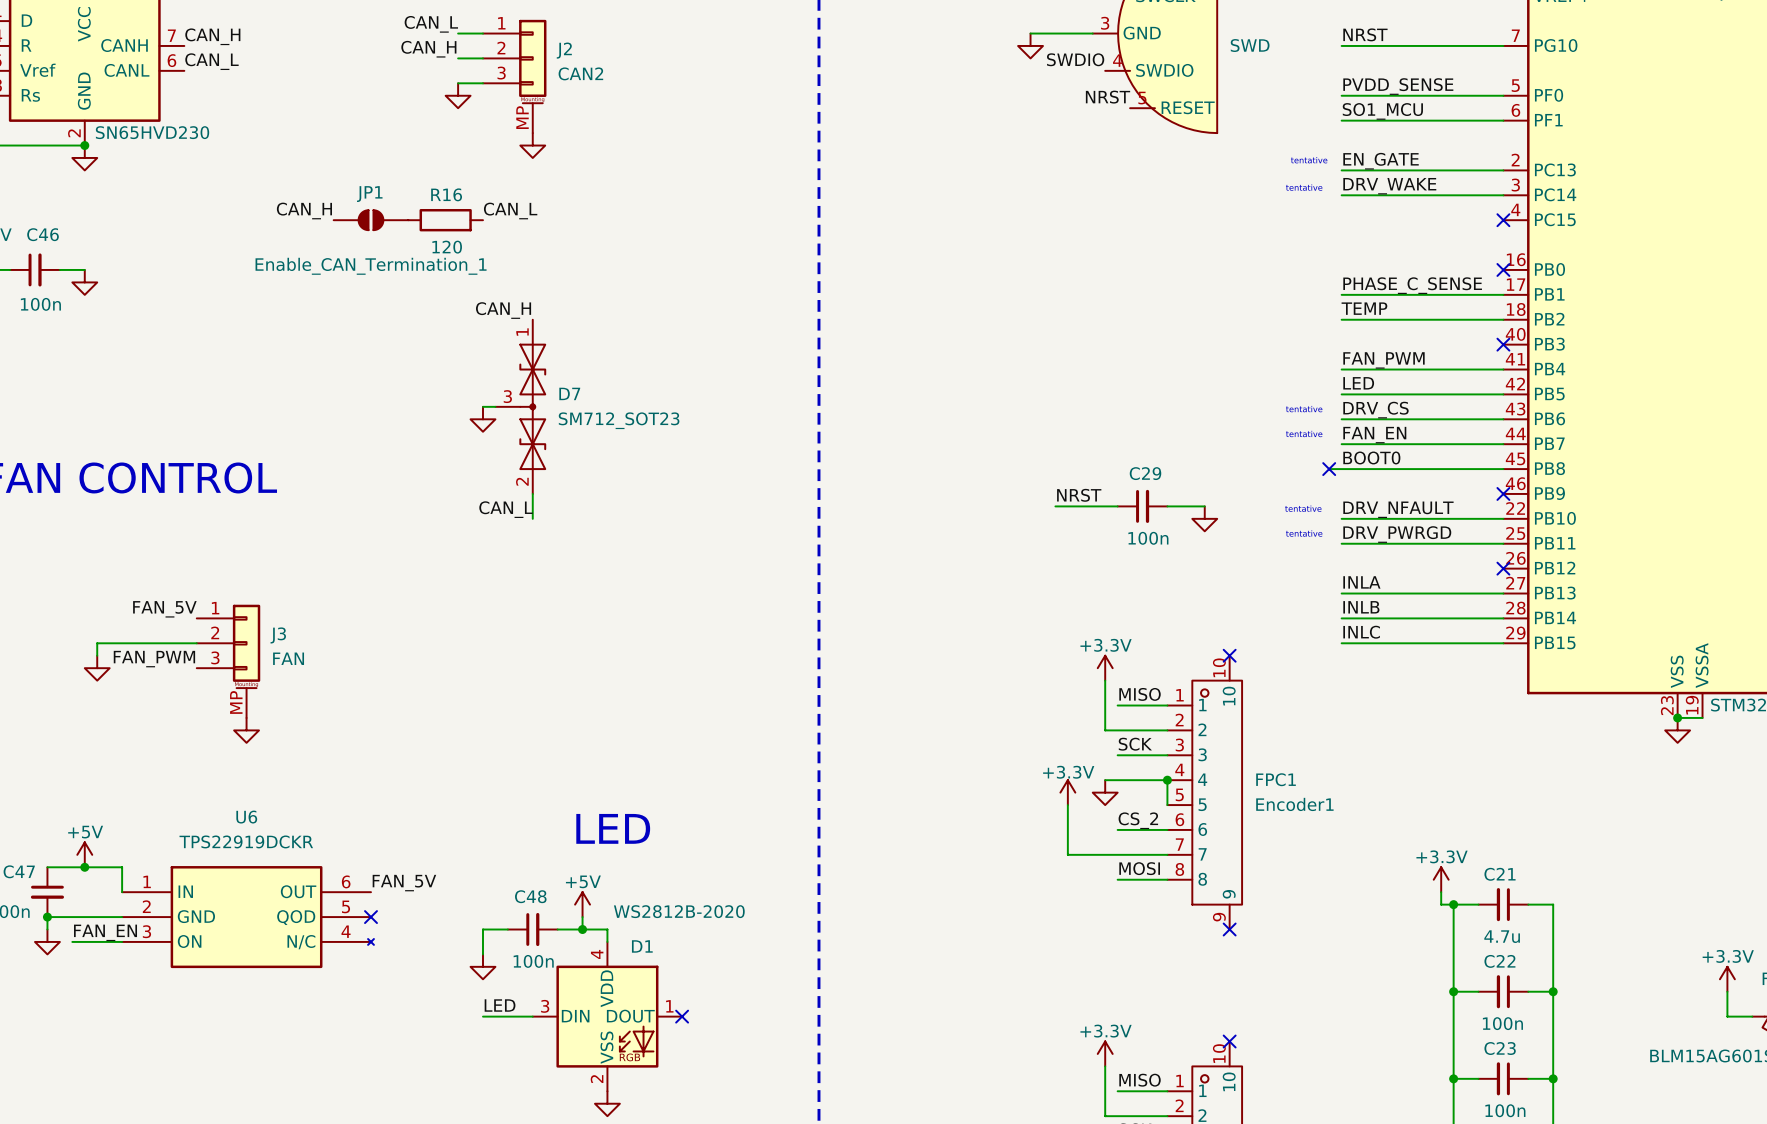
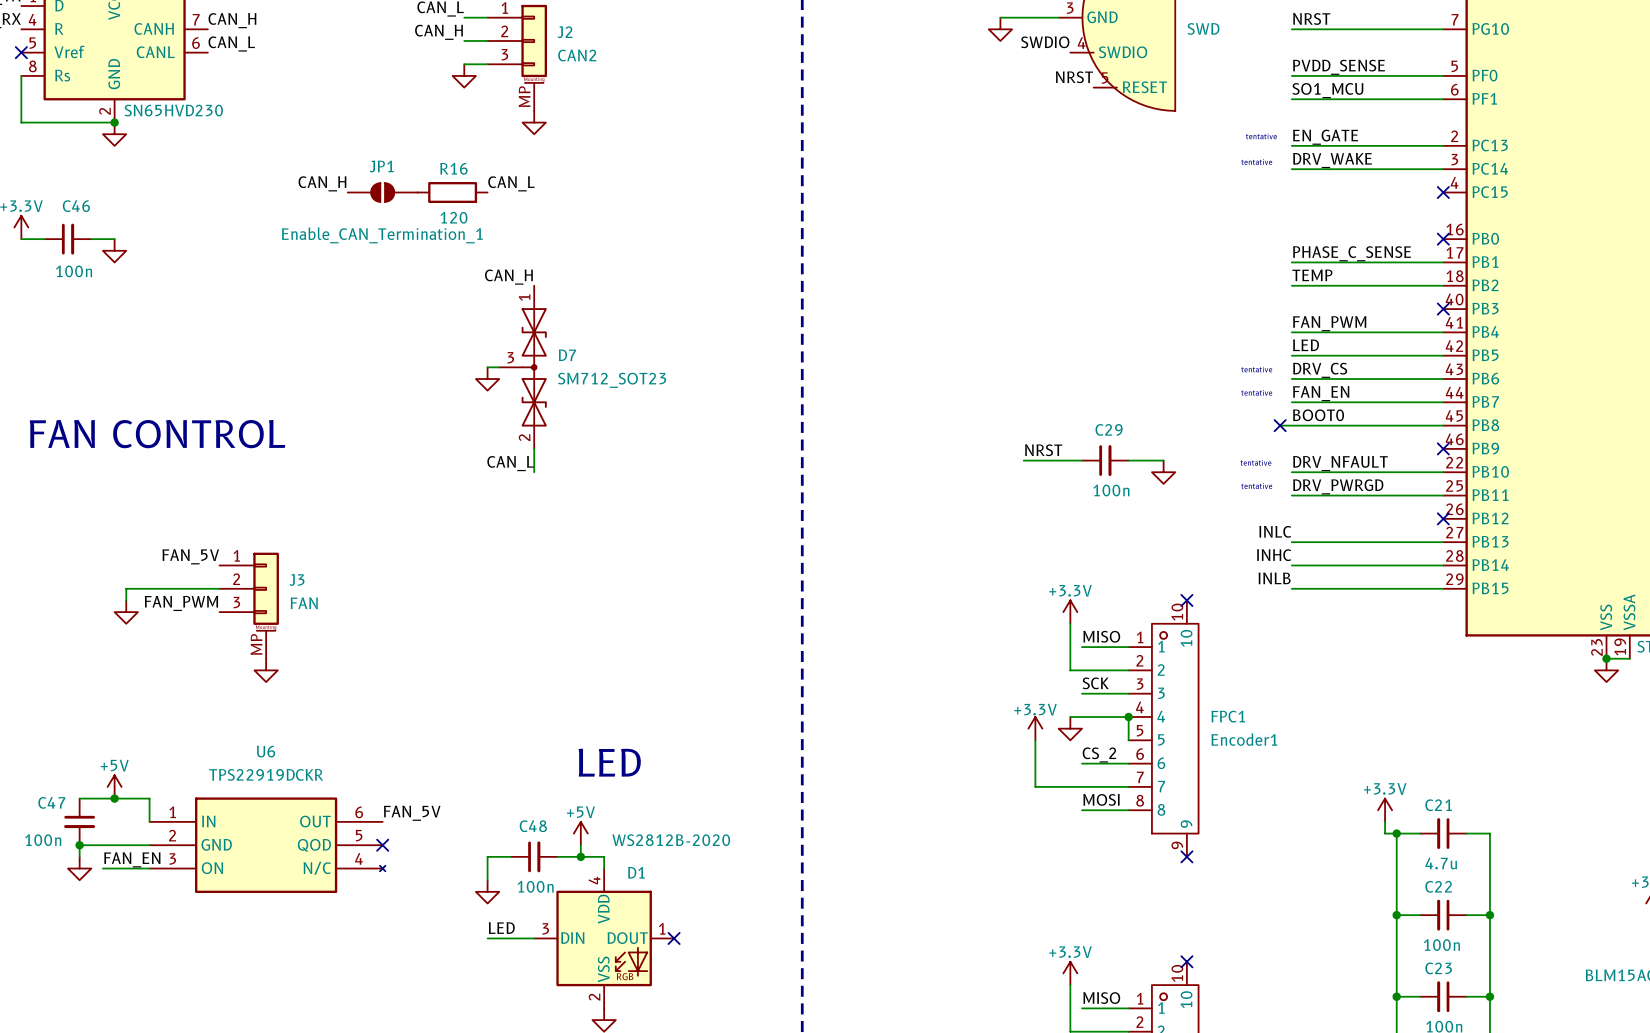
label: INLA (1361, 582) -> INLC (1275, 531)
label: INLB (1361, 607) -> INHC (1274, 555)
label: INLC (1361, 632) -> INLB (1274, 578)

